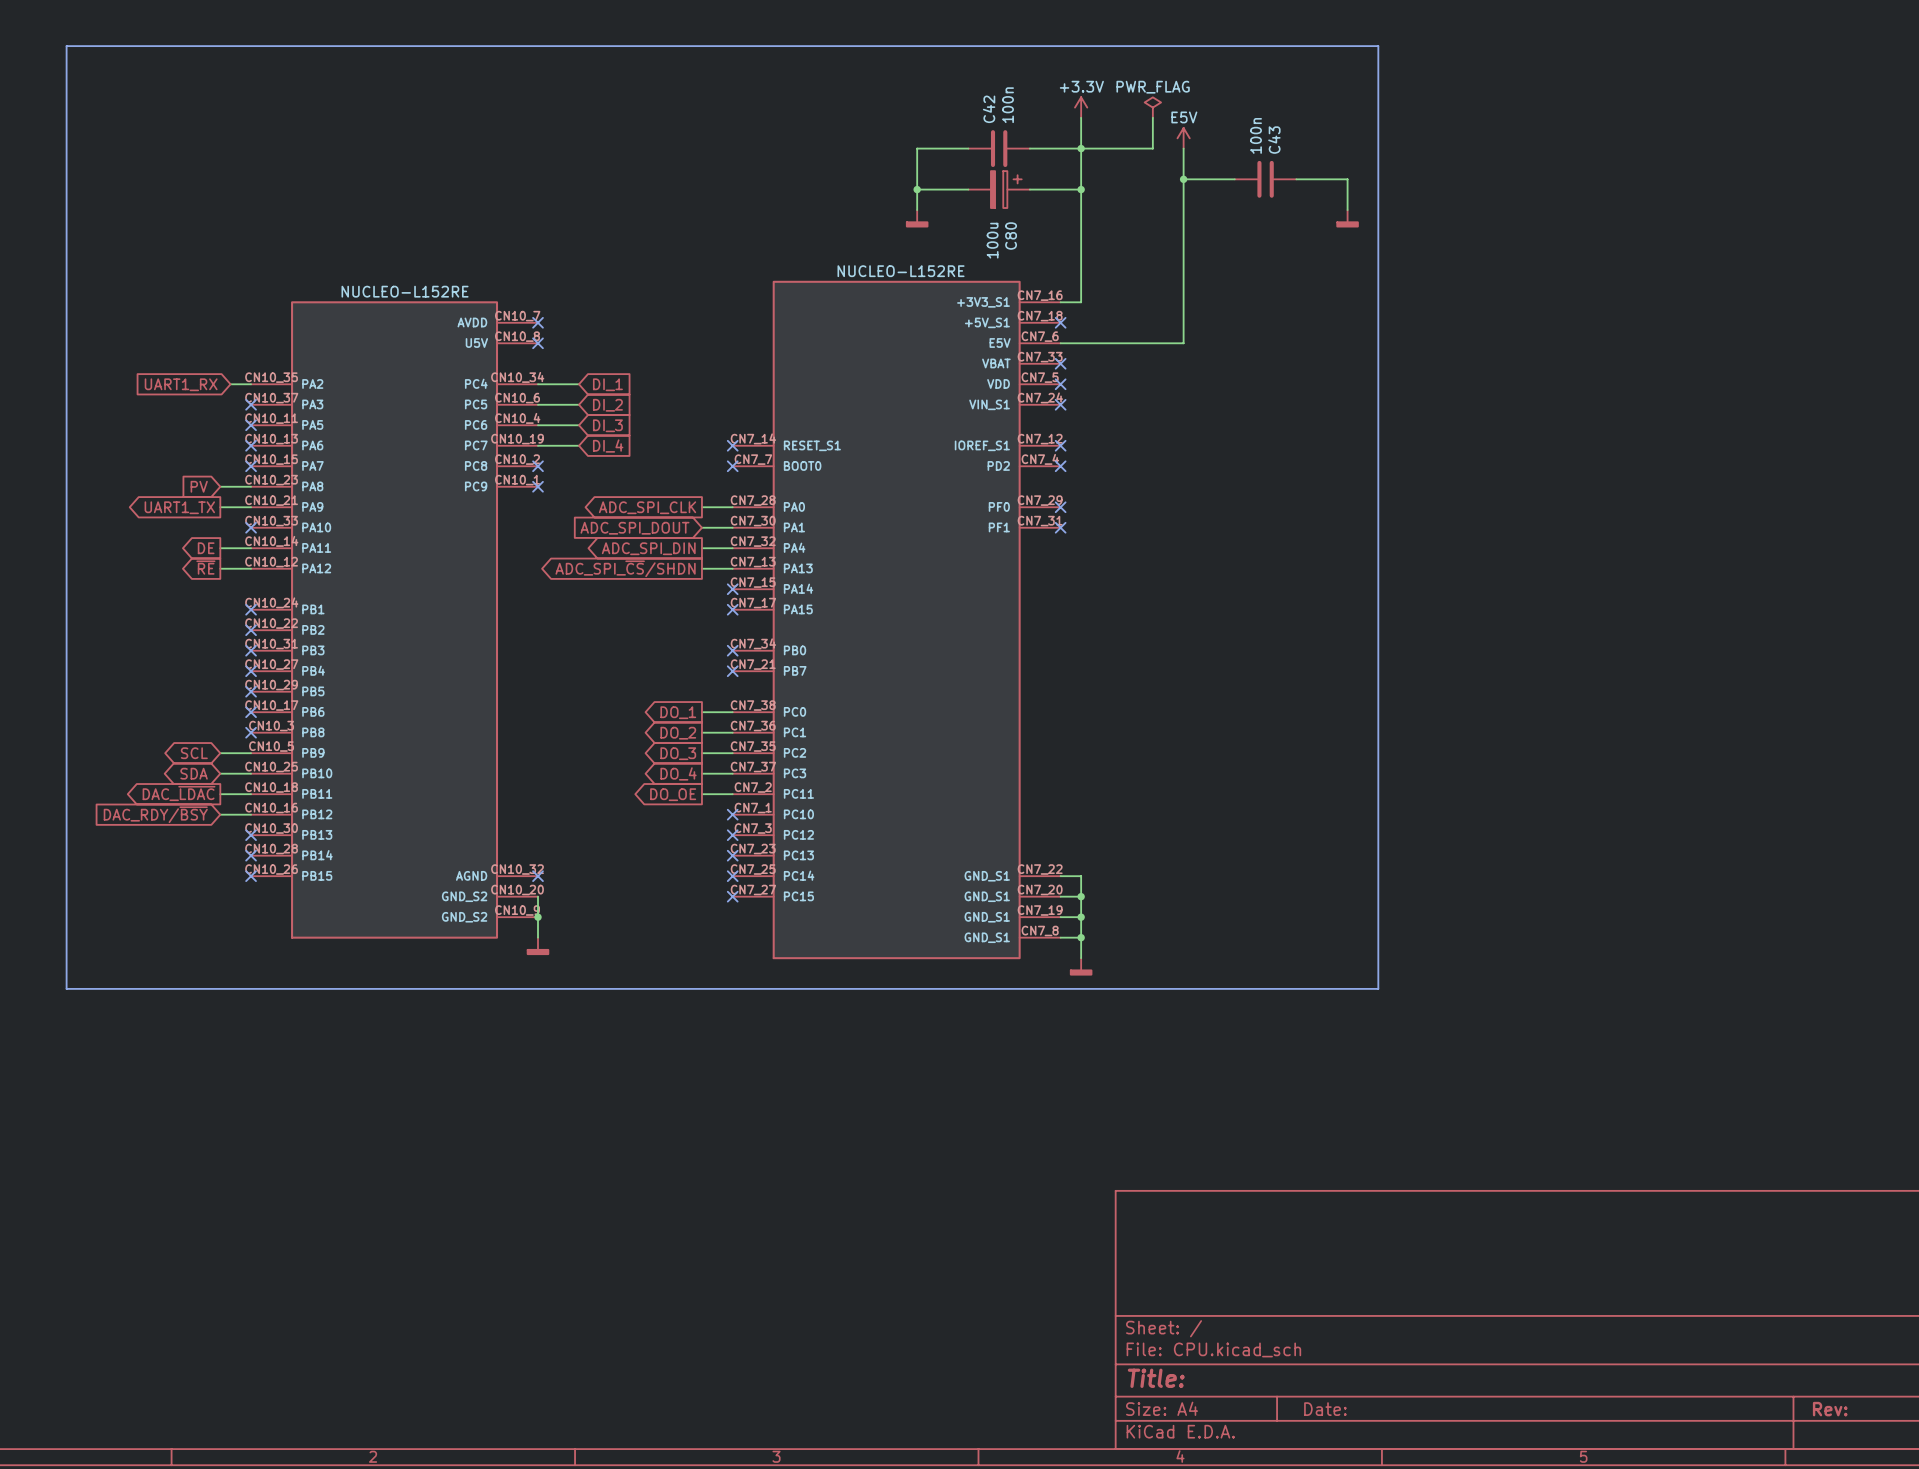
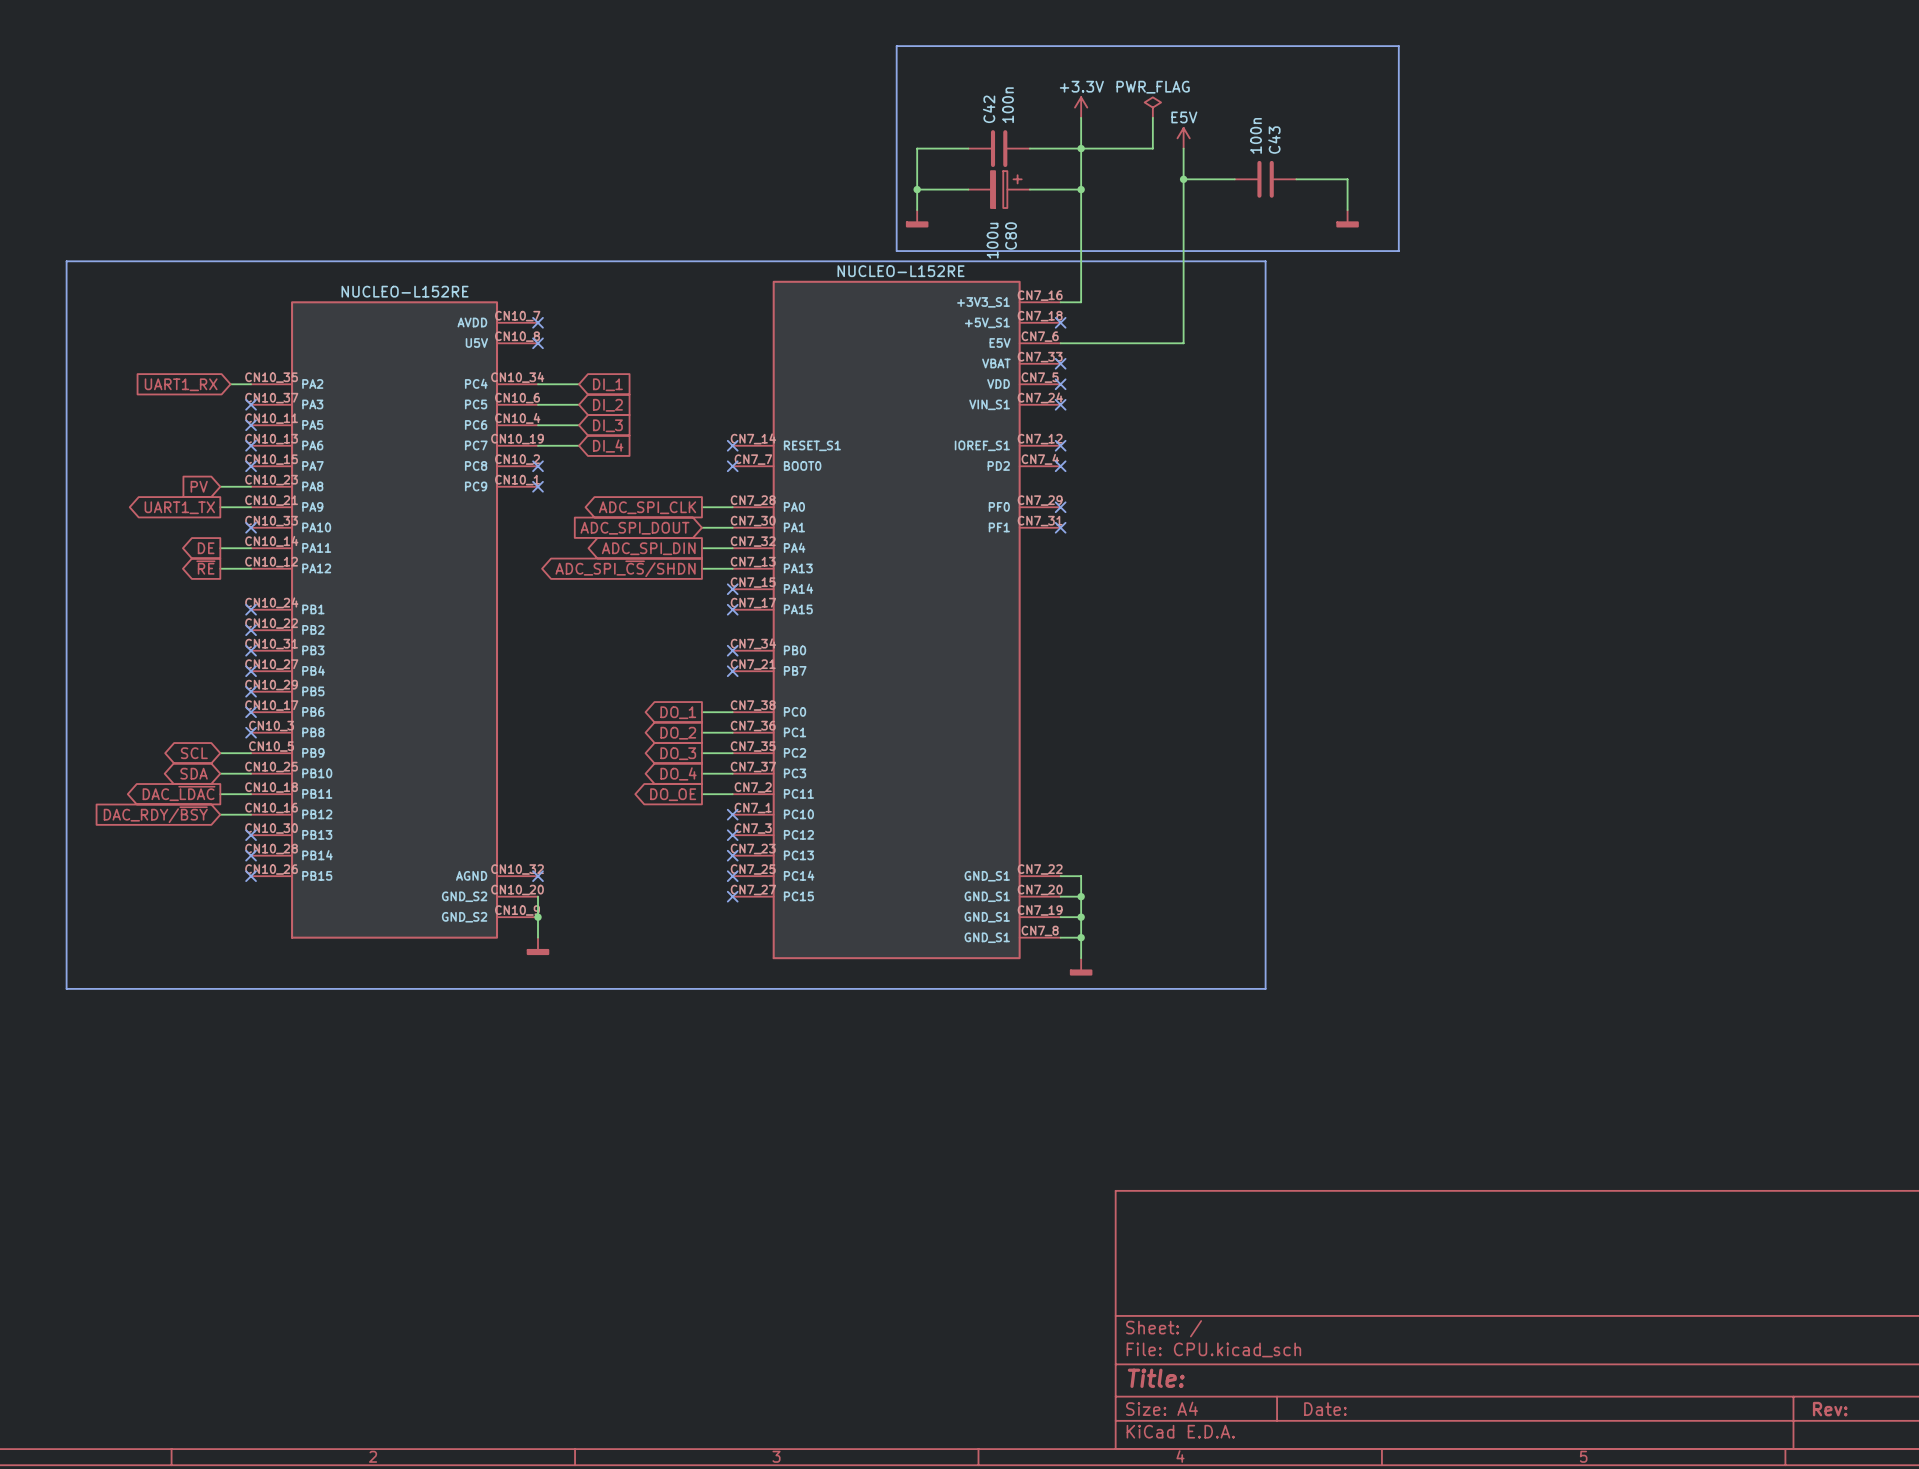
line: (896, 46) (66, 46) (66, 261) -> (1265, 988) (1265, 261) (66, 261)
line: (1378, 46) (1378, 988) (1265, 988) -> (1378, 46) (1398, 46) (1398, 251) (896, 251) (896, 46)

